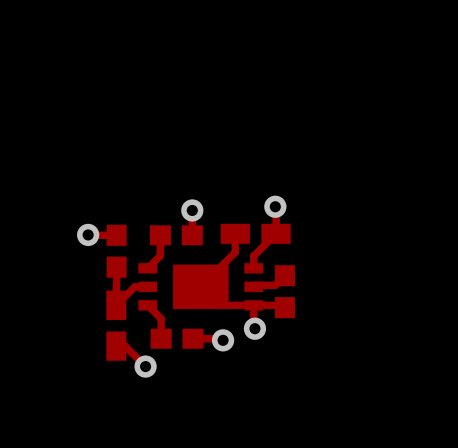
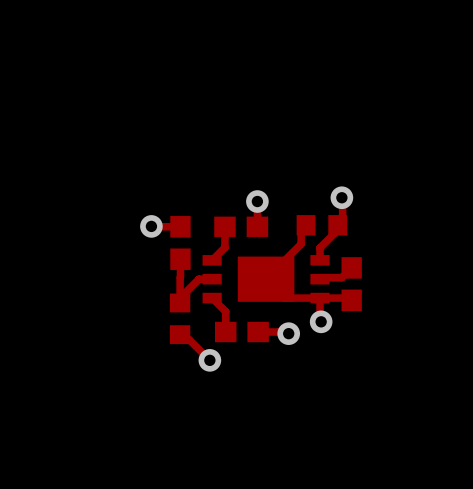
part footprint: [220, 223, 291, 244] -> [296, 215, 348, 236]
part footprint: [106, 290, 127, 361] -> [169, 293, 191, 345]

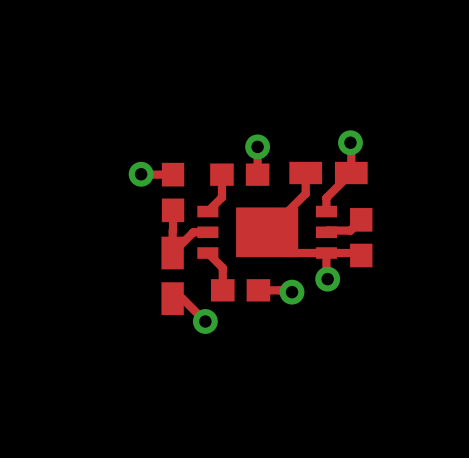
part footprint: [296, 215, 348, 236] -> [289, 161, 368, 185]
part footprint: [169, 293, 191, 345] -> [161, 236, 184, 315]

